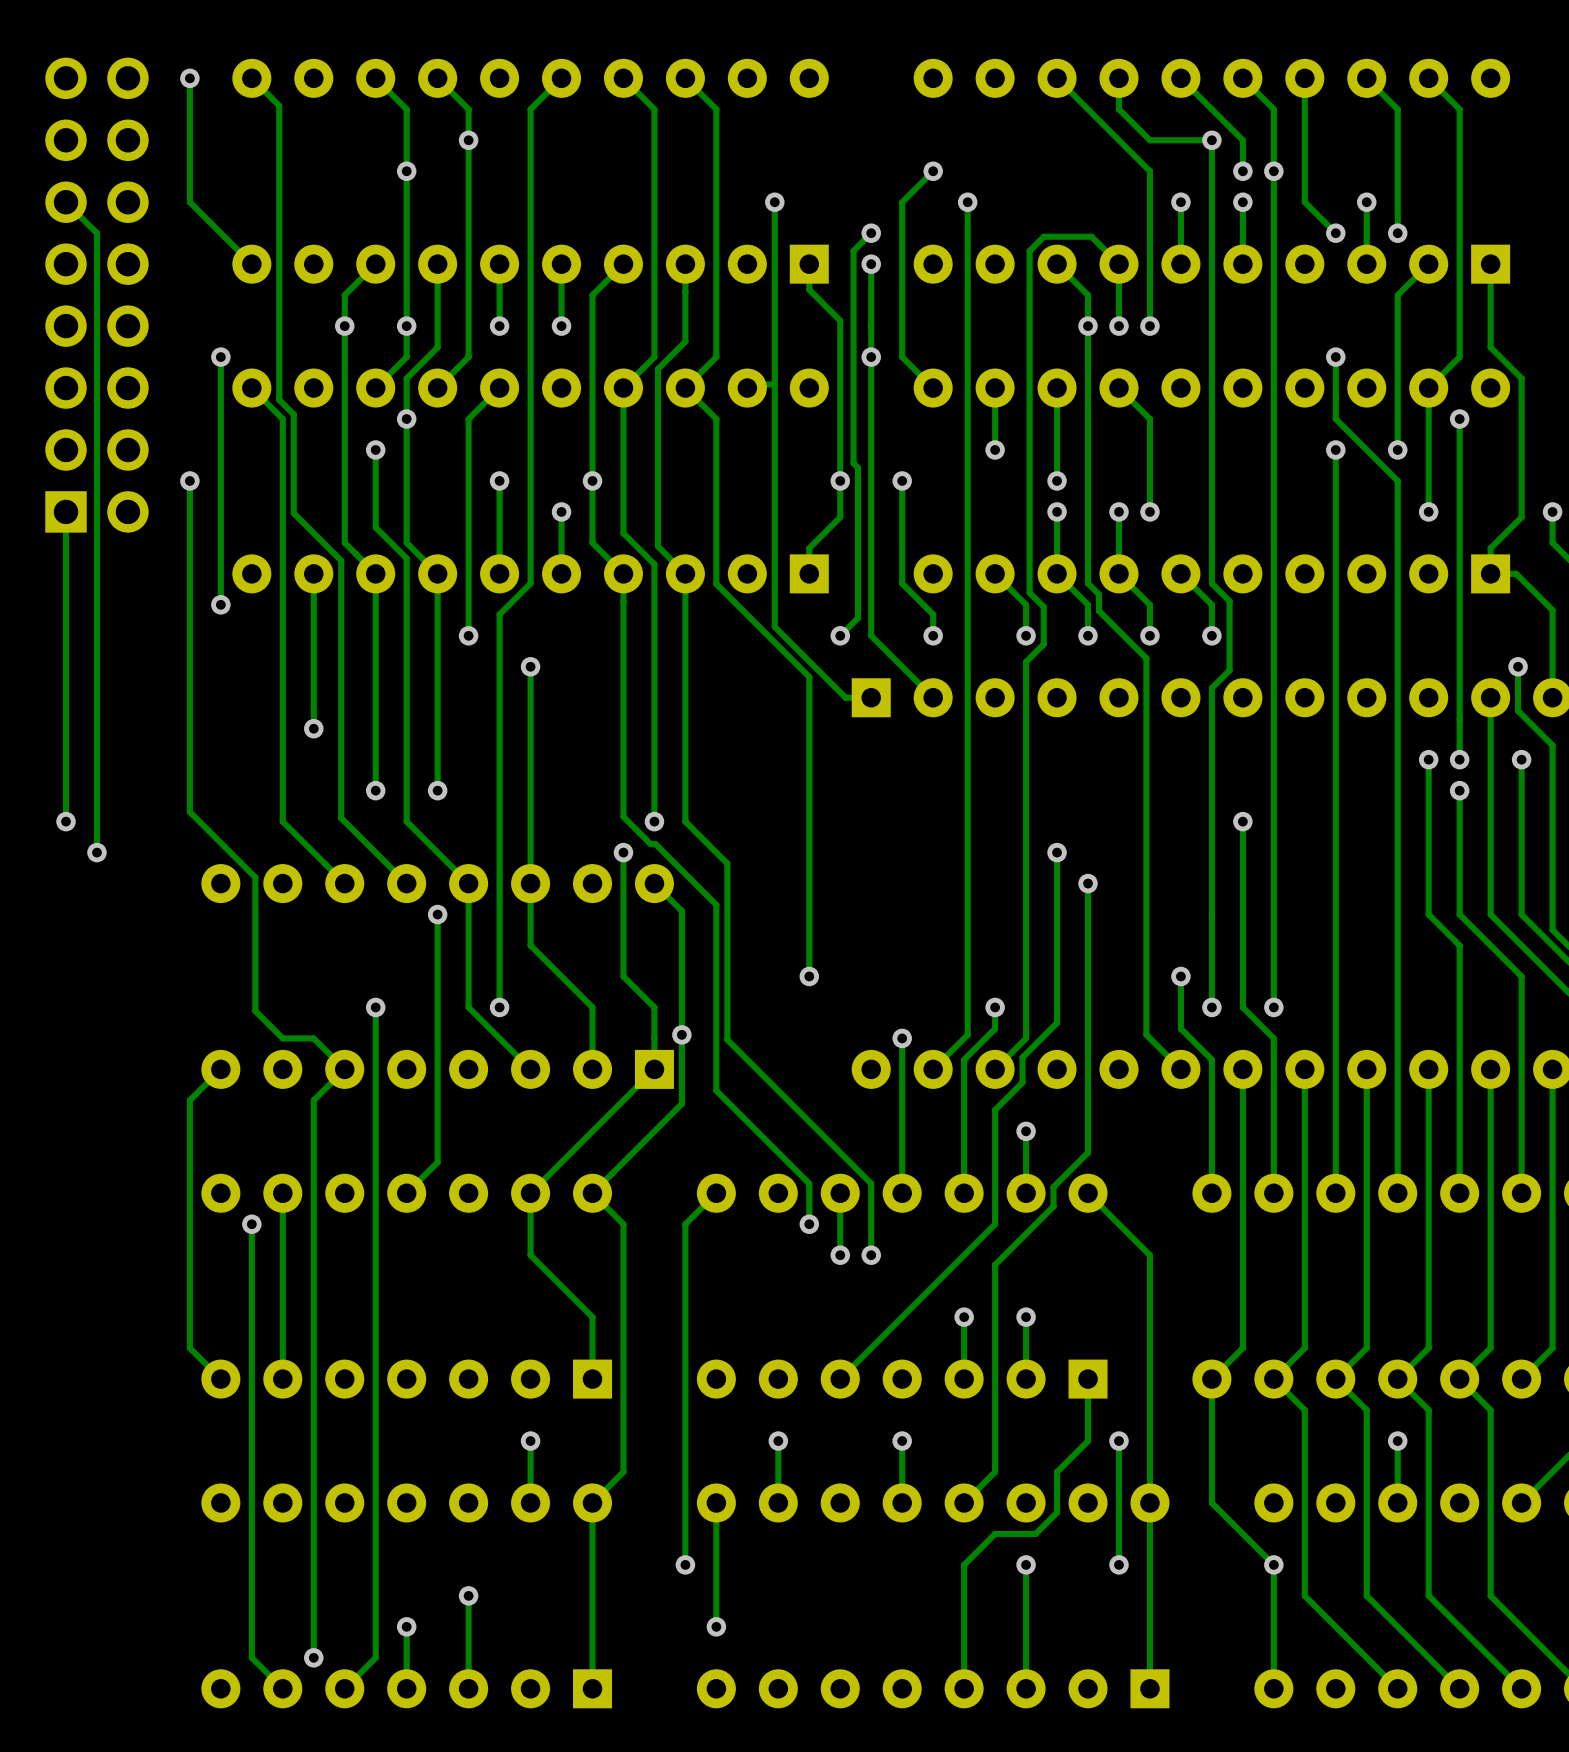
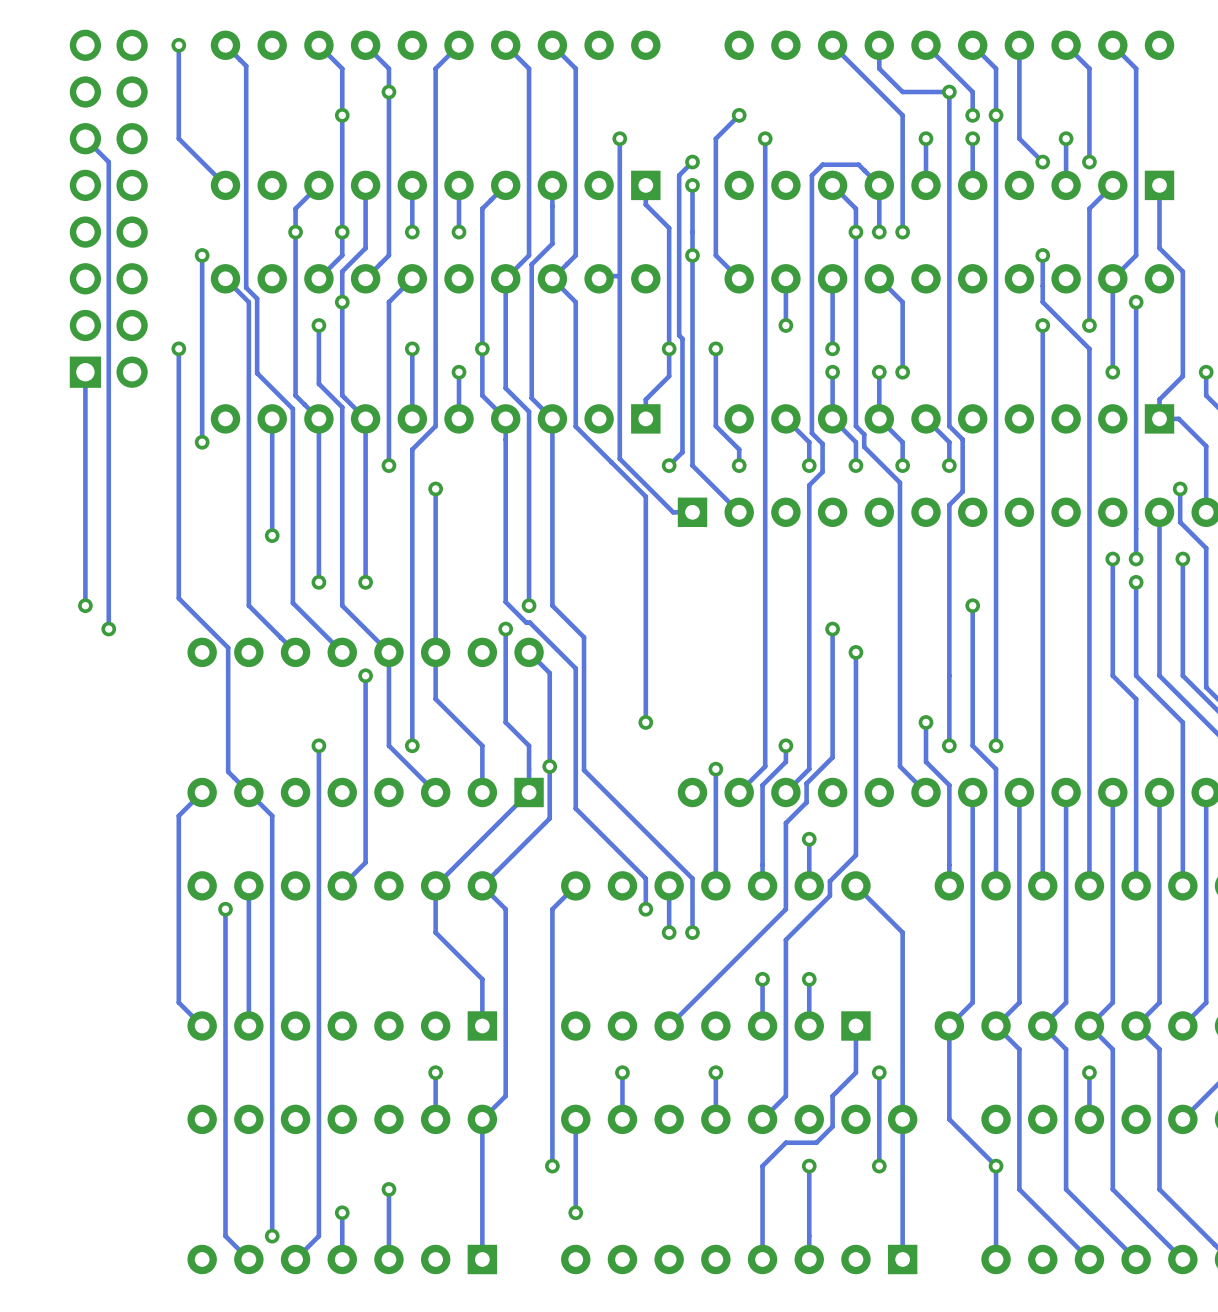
track: (255, 1010) (282, 1038) (313, 1038) (344, 1069) (313, 1100) -> (228, 748) (228, 771) (272, 815)

